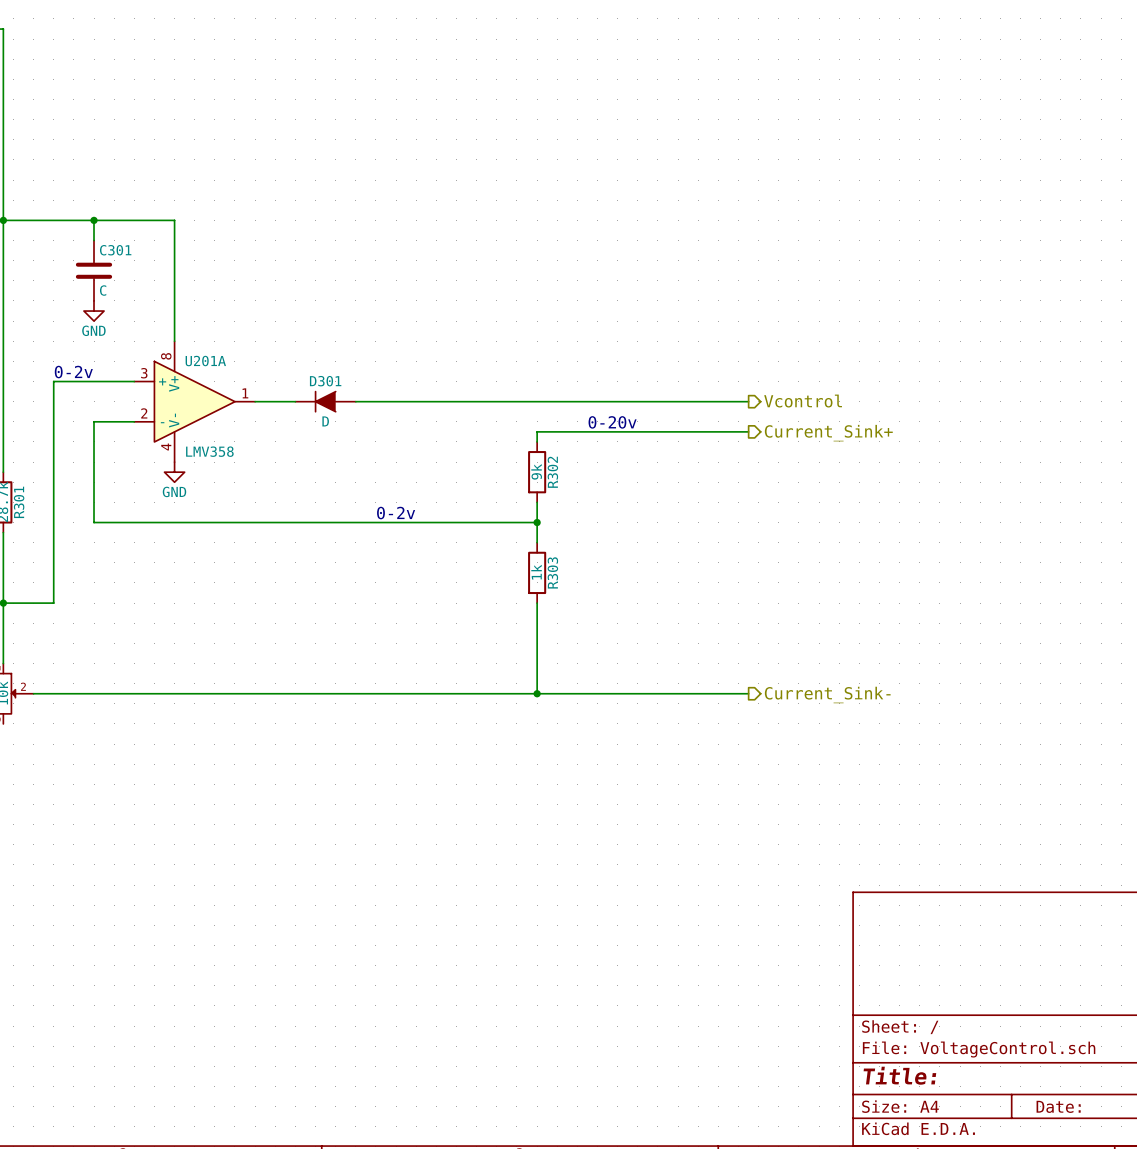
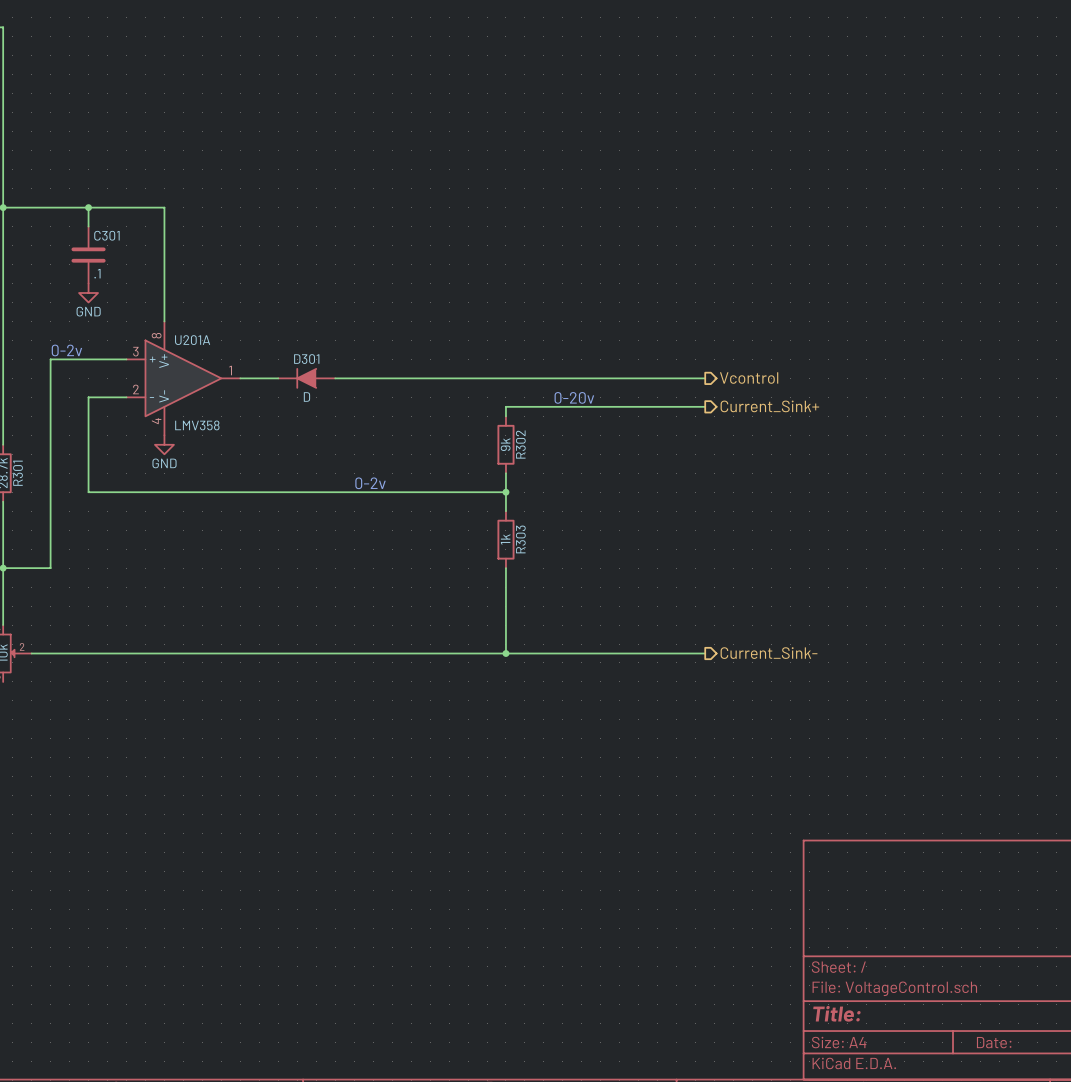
C301 value: C (103, 290) -> .1 (97, 273)

